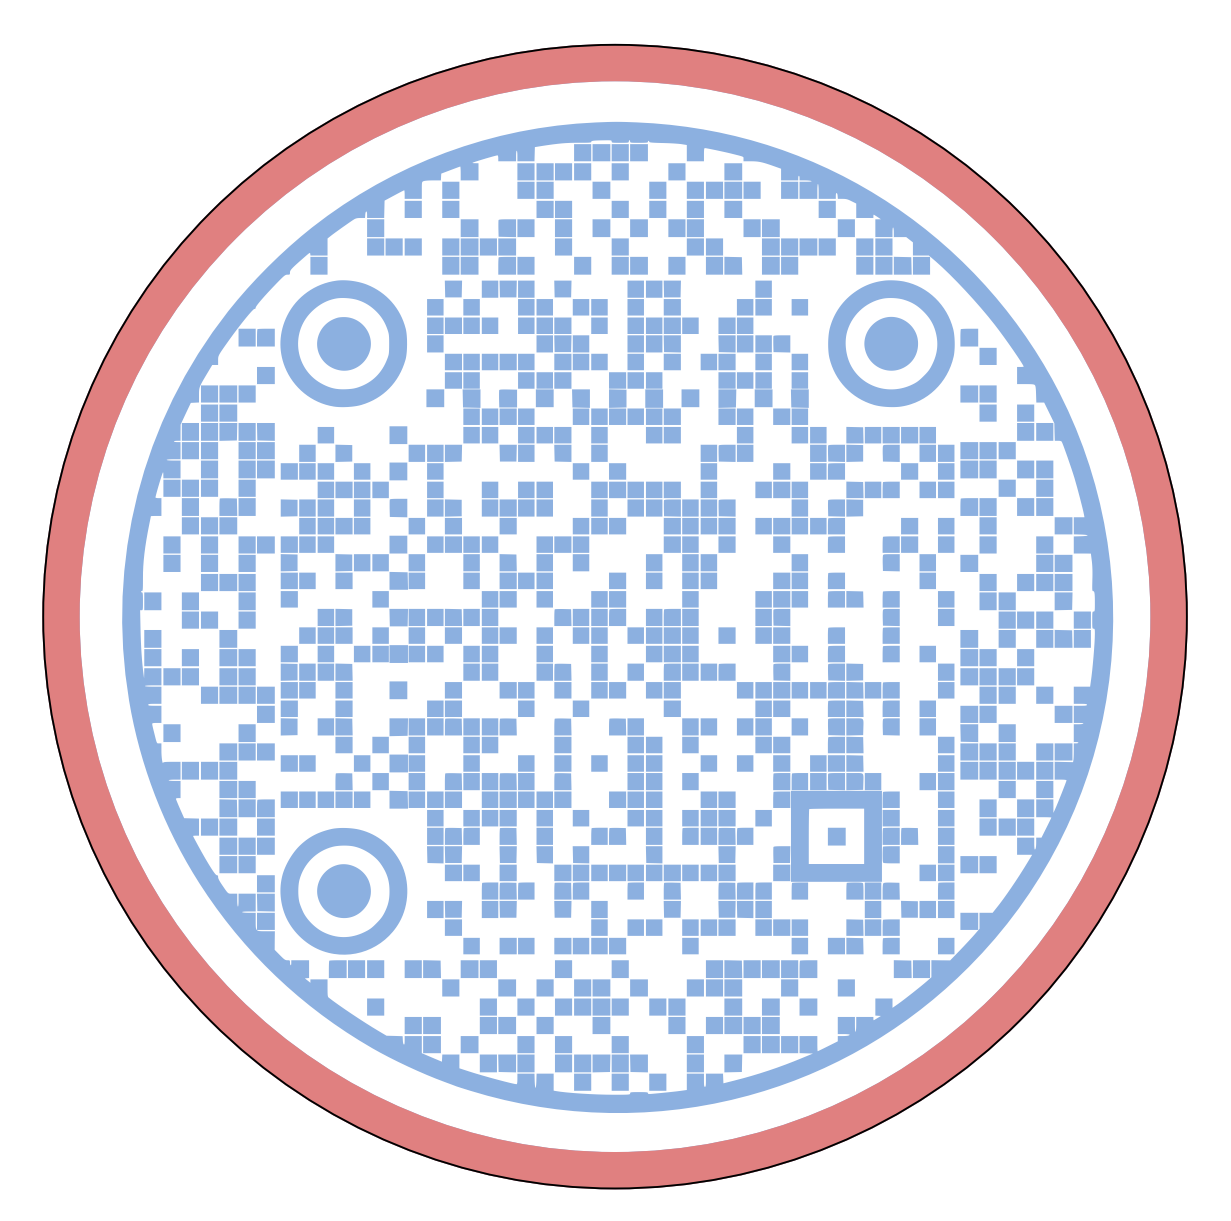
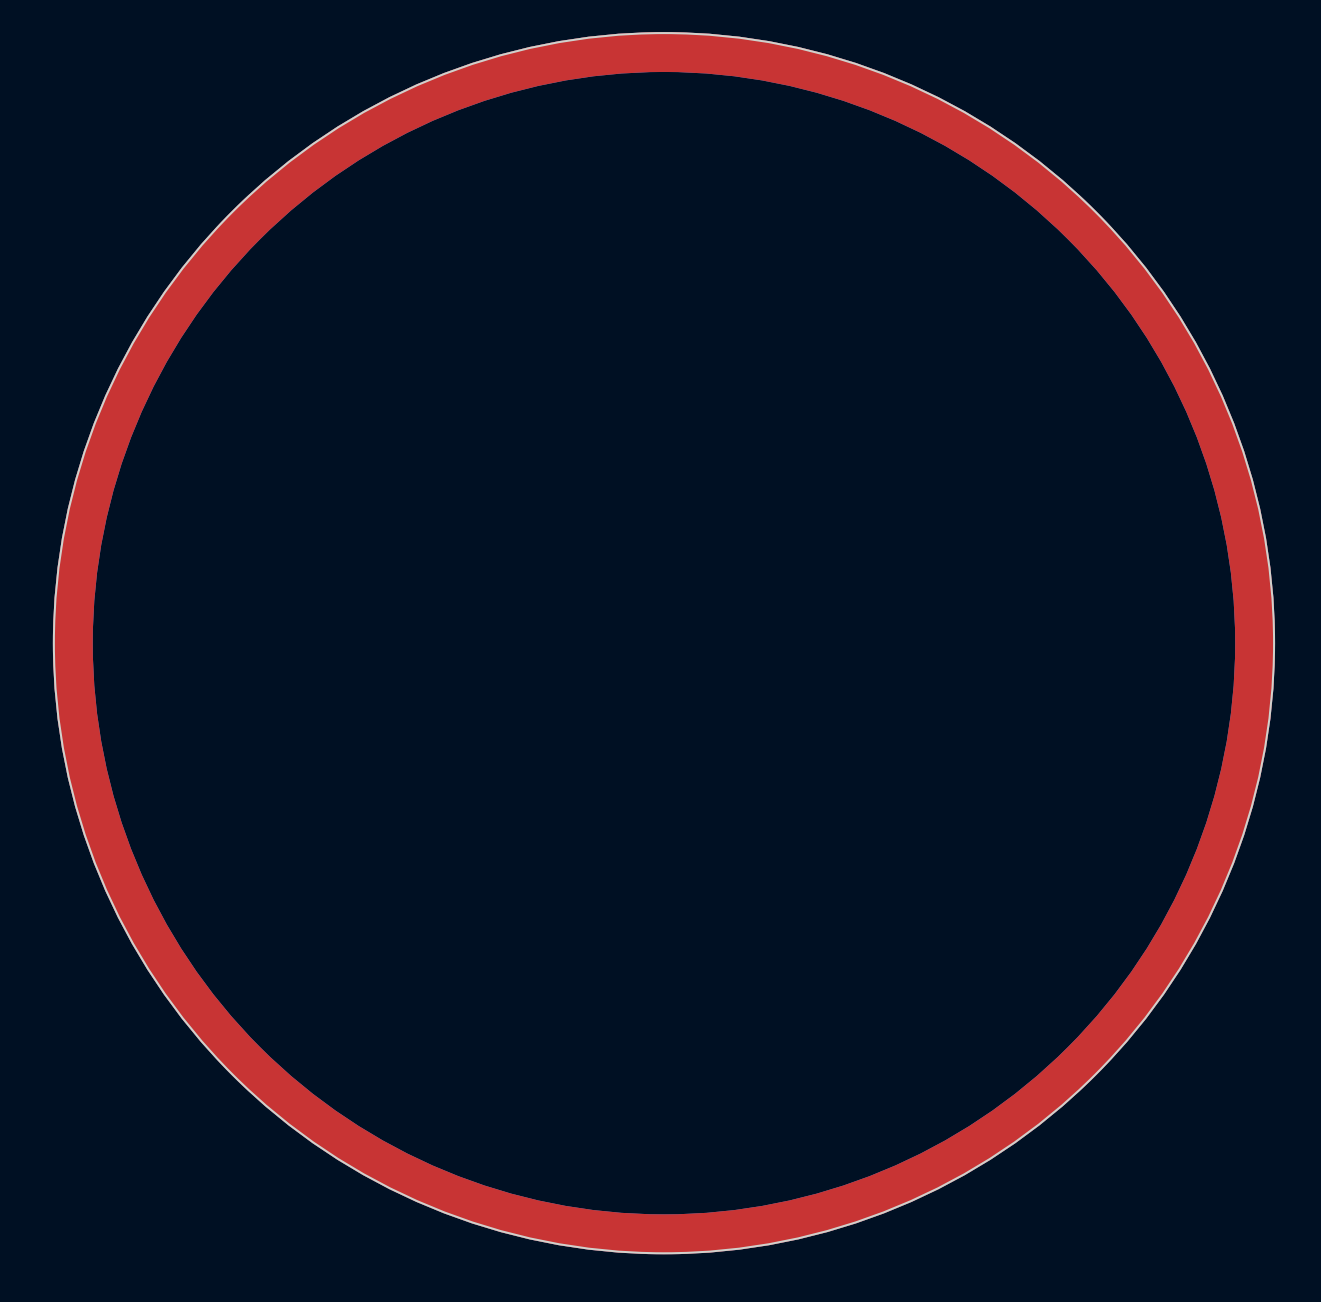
drawing: [122, 121, 1114, 1113] -> none

